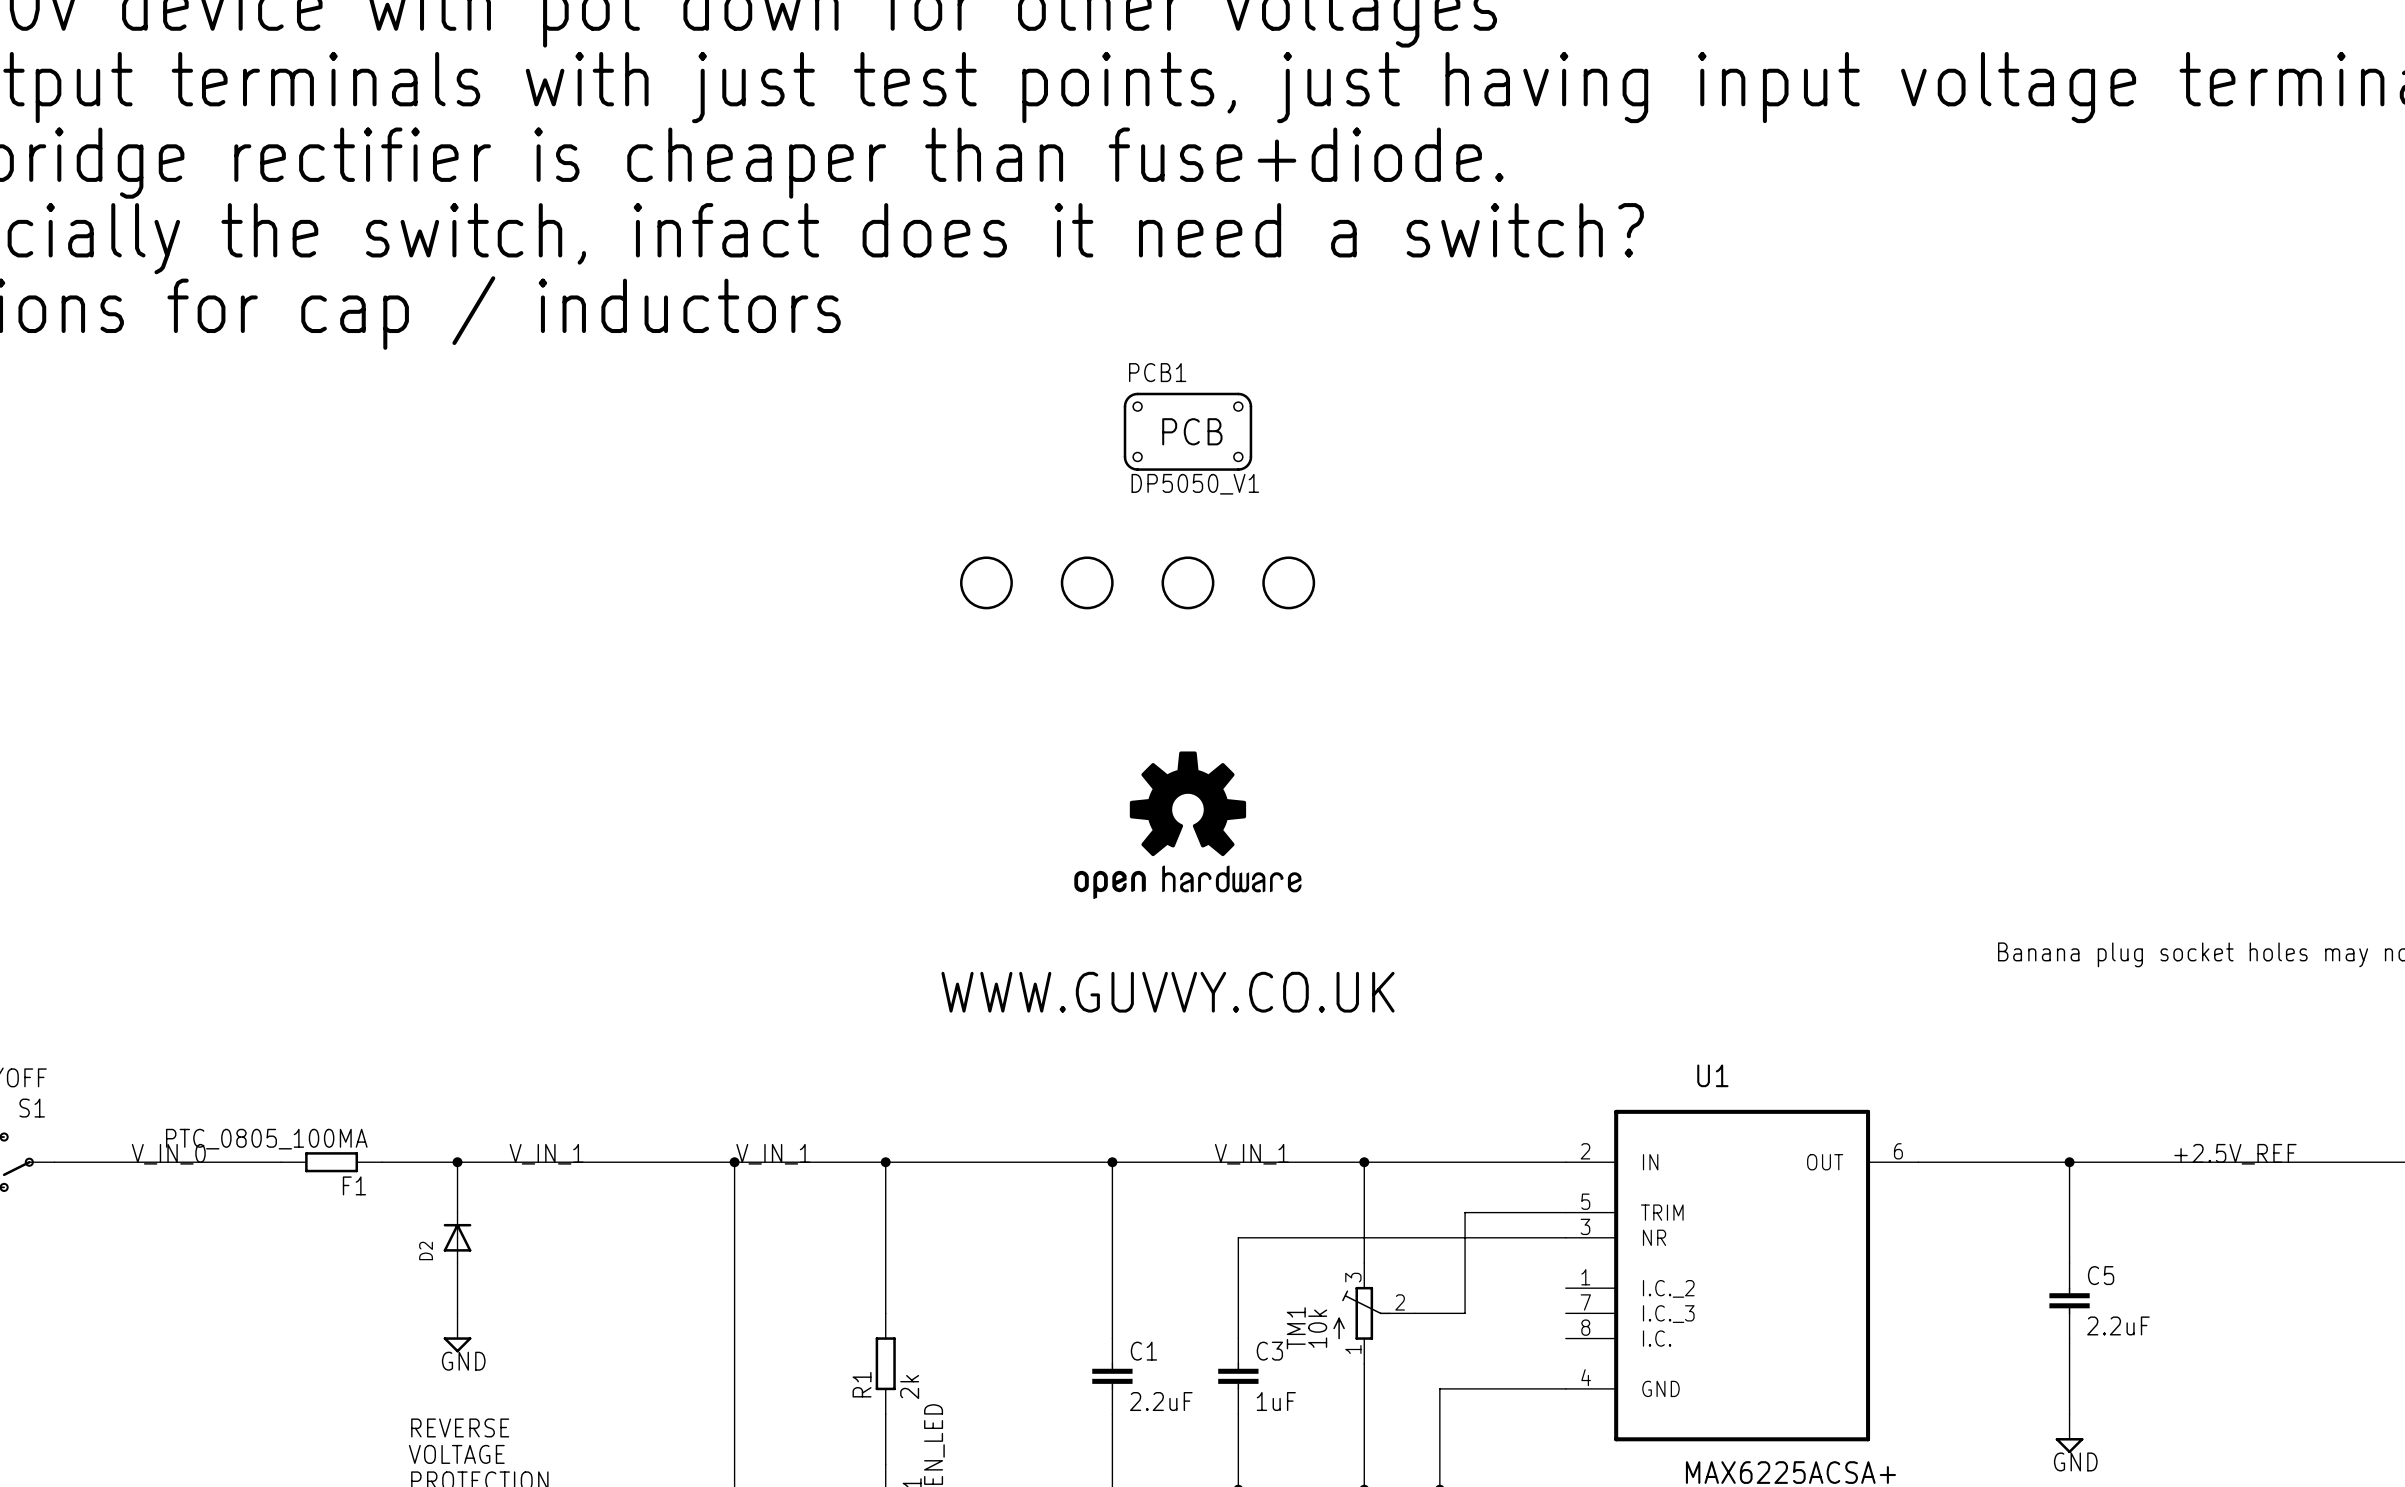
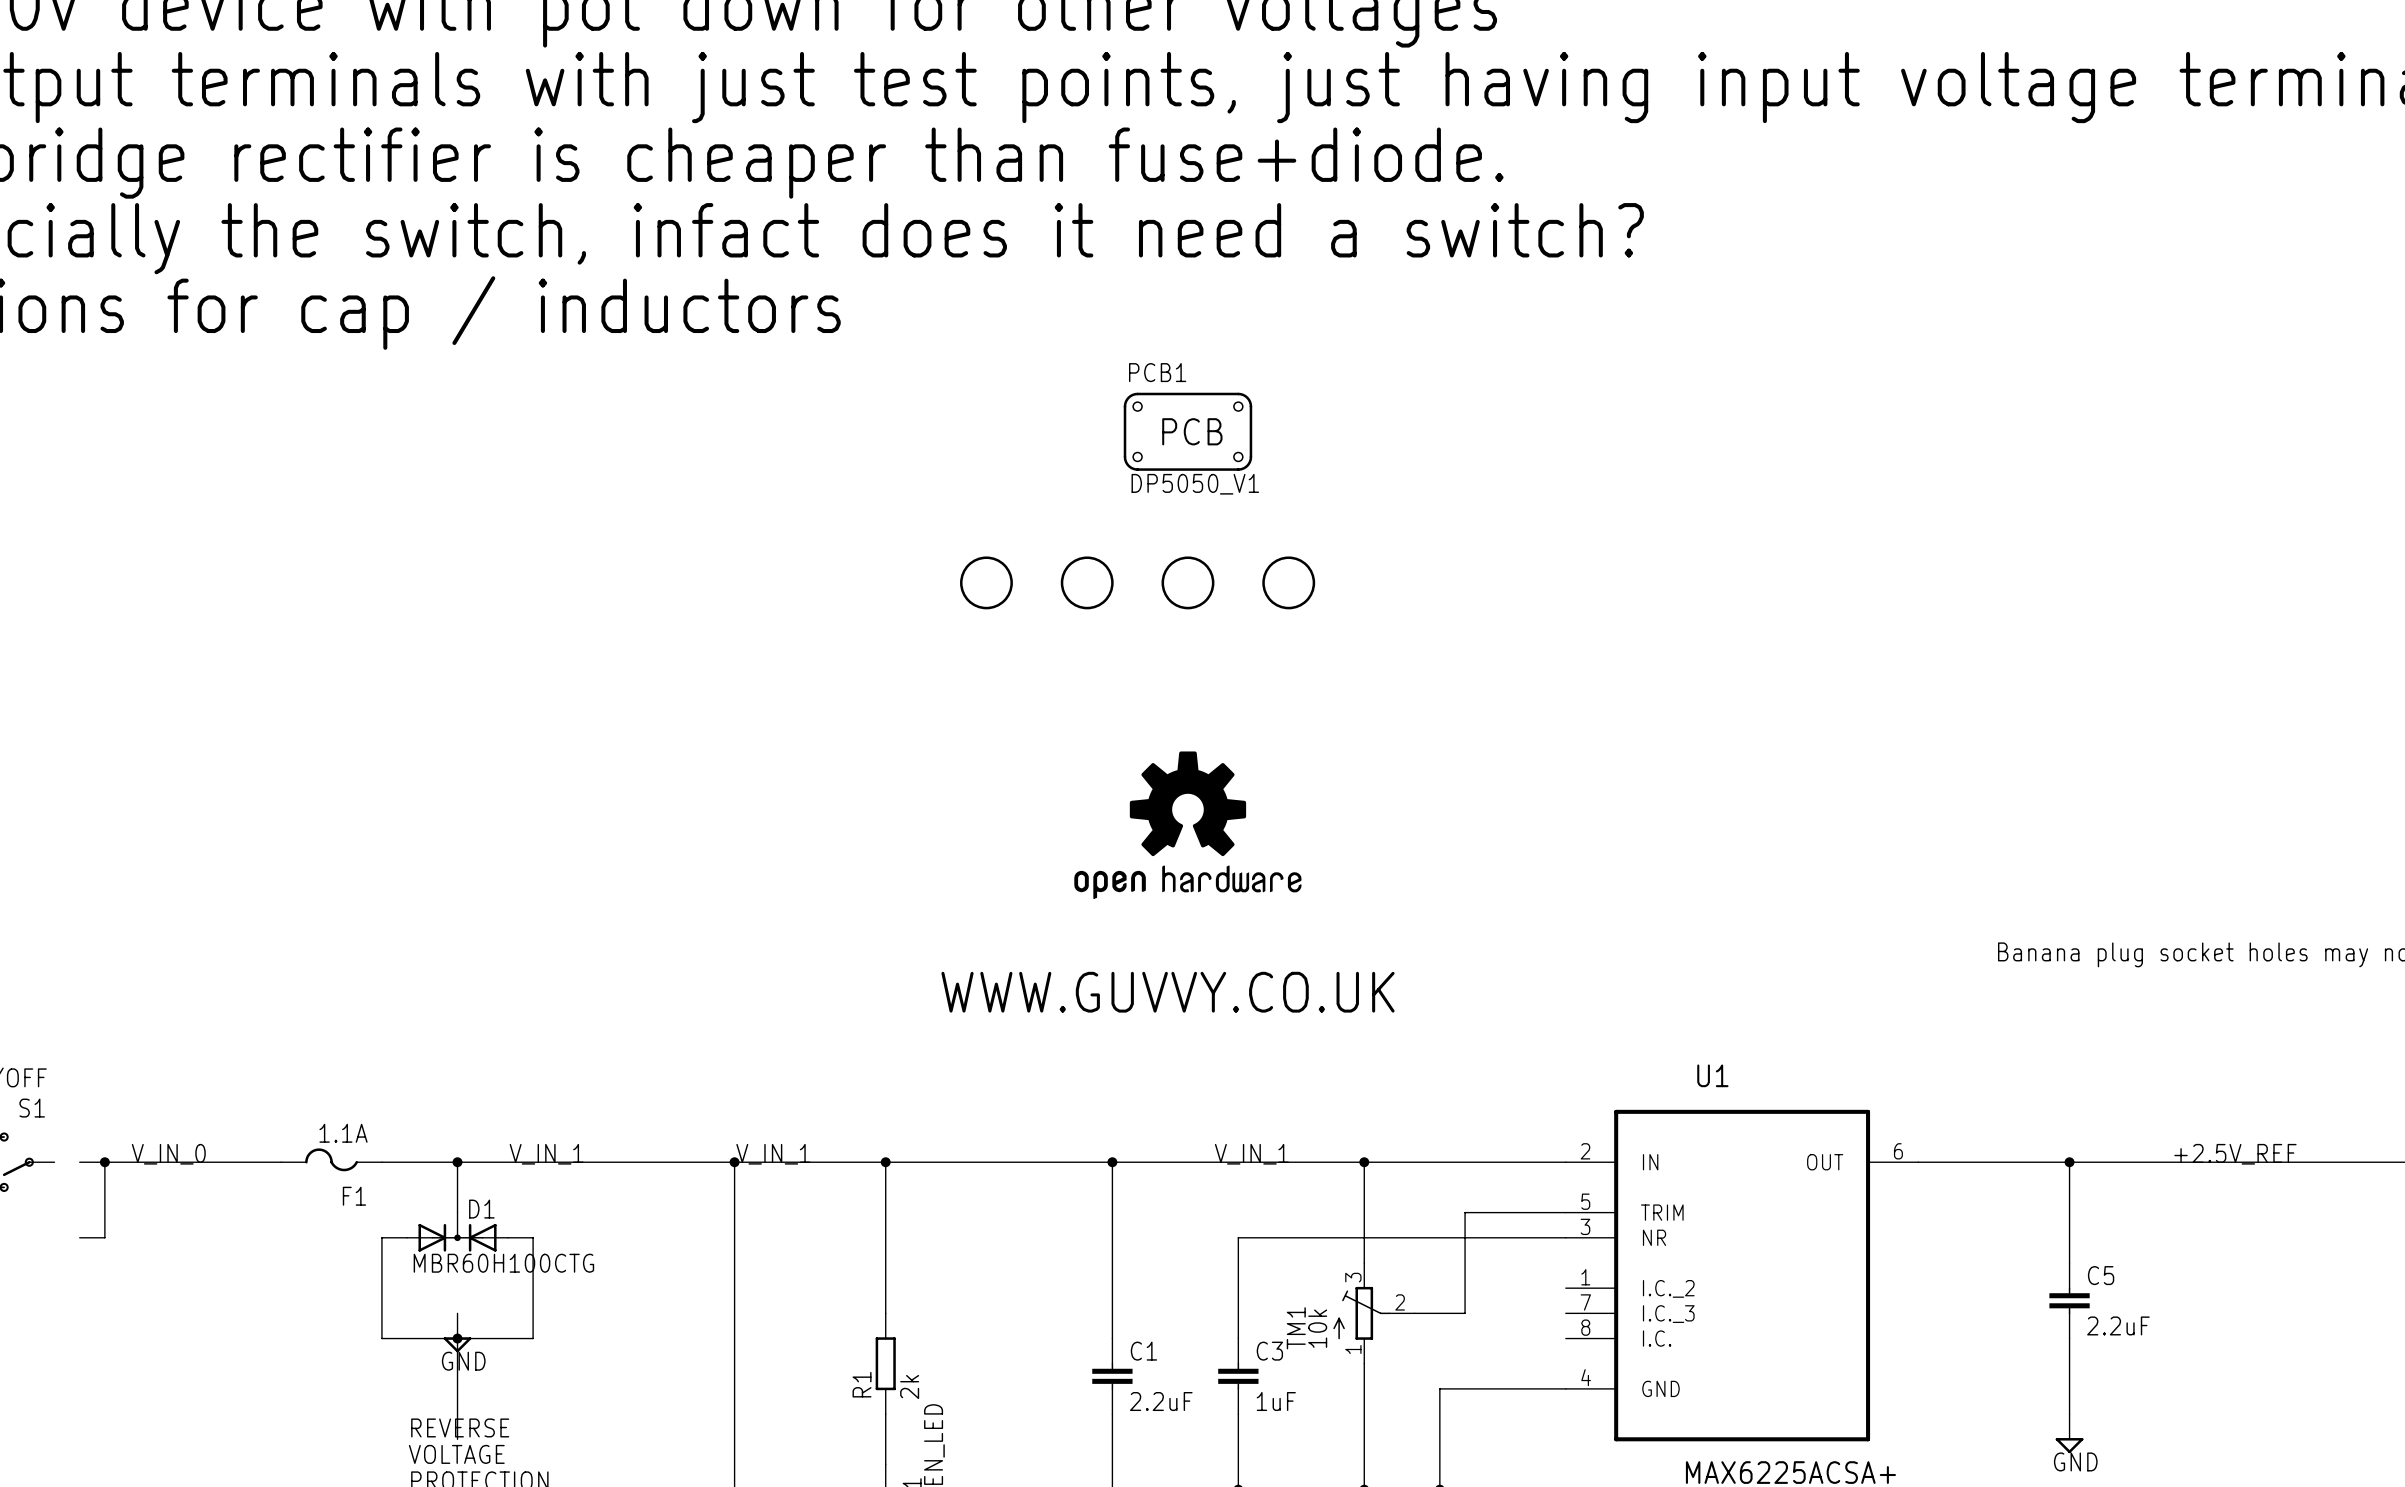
F1 value: PTC_0805_100MA (266, 1139) -> 1.1A (343, 1133)
F1 symbol: [281, 1152, 382, 1173] -> [281, 1148, 382, 1172]
wire: (54, 1162) (79, 1162) -> none
wire: none -> (104, 1162) (104, 1237) (79, 1237)
junction: none -> (104, 1162)
D1: none -> MBR60H100CTG (457, 1232)
wire: none -> (407, 1237) (381, 1237) (381, 1338) (533, 1338) (533, 1237) (507, 1237)
D2: (457, 1237) -> none
wire: (457, 1262) (457, 1313) -> none
wire: none -> (457, 1338) (457, 1439)
junction: none -> (457, 1338)

